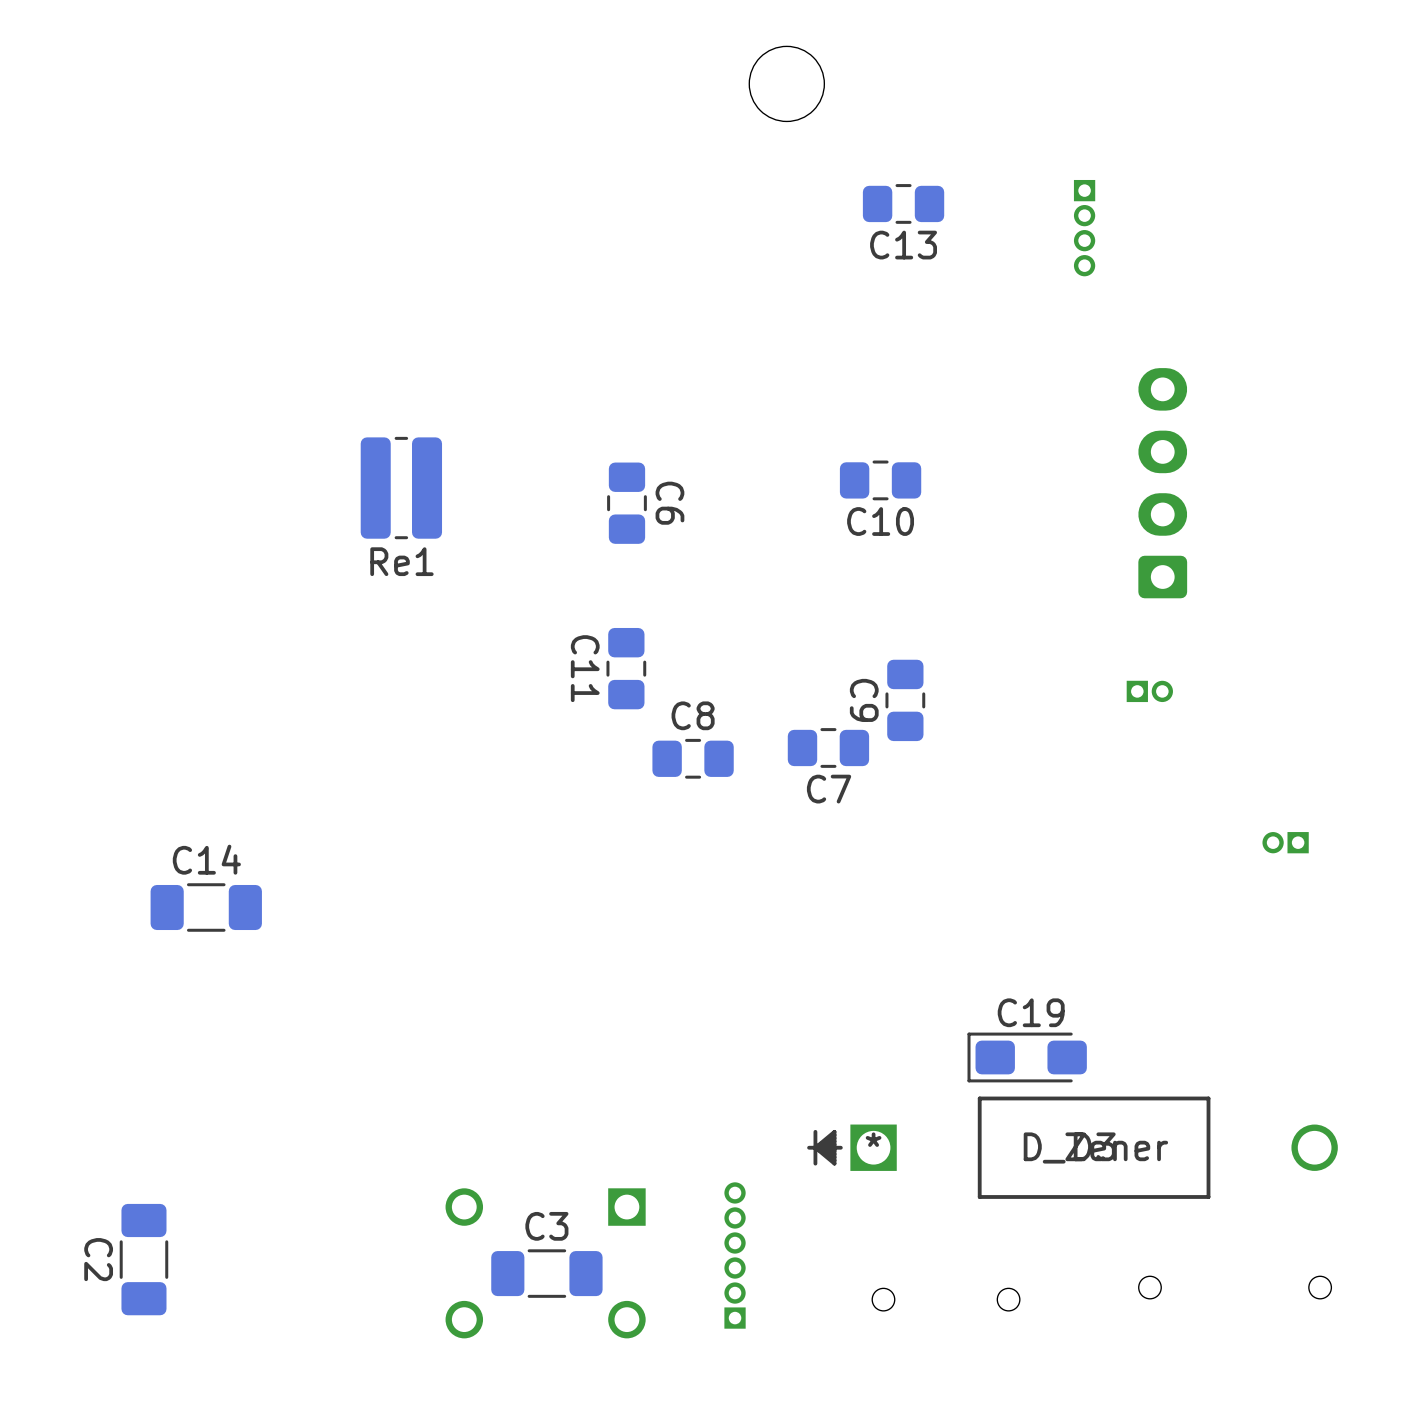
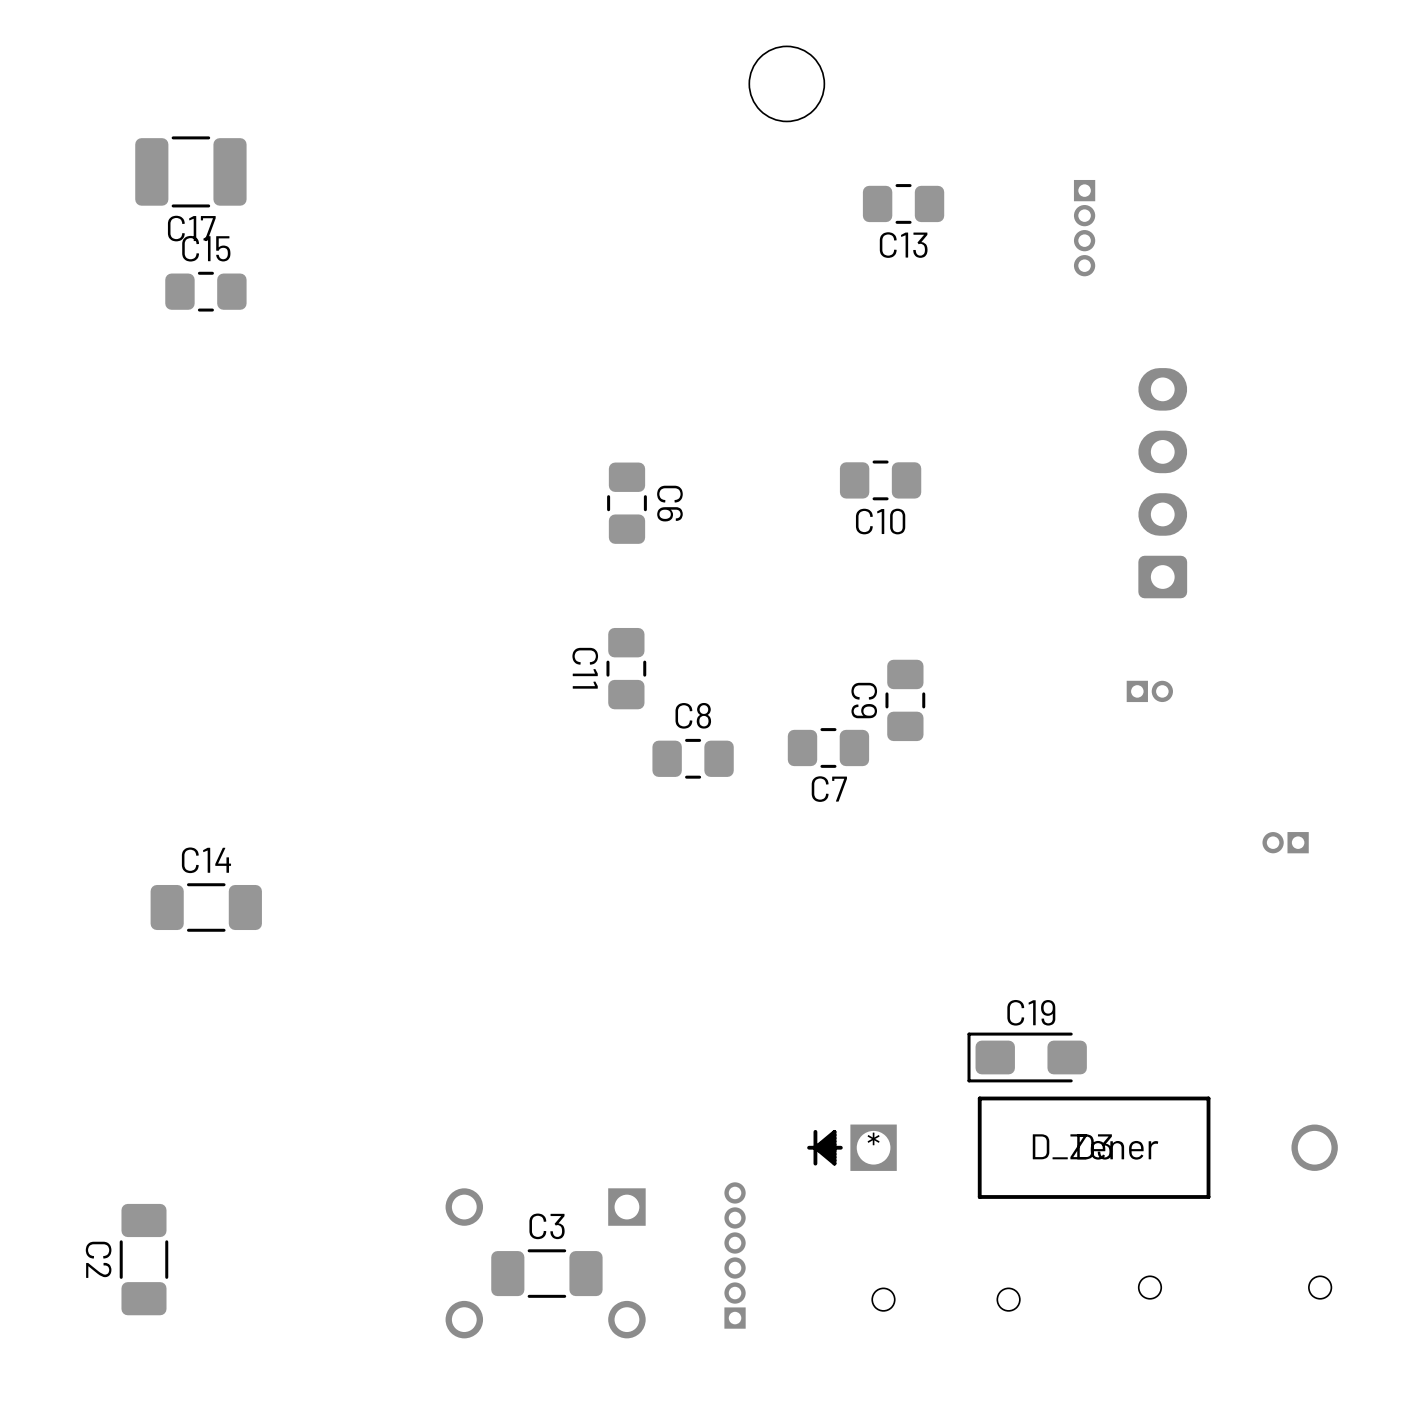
C17: none -> (190, 171)
C15: none -> (205, 291)
Re1: (401, 488) -> none

